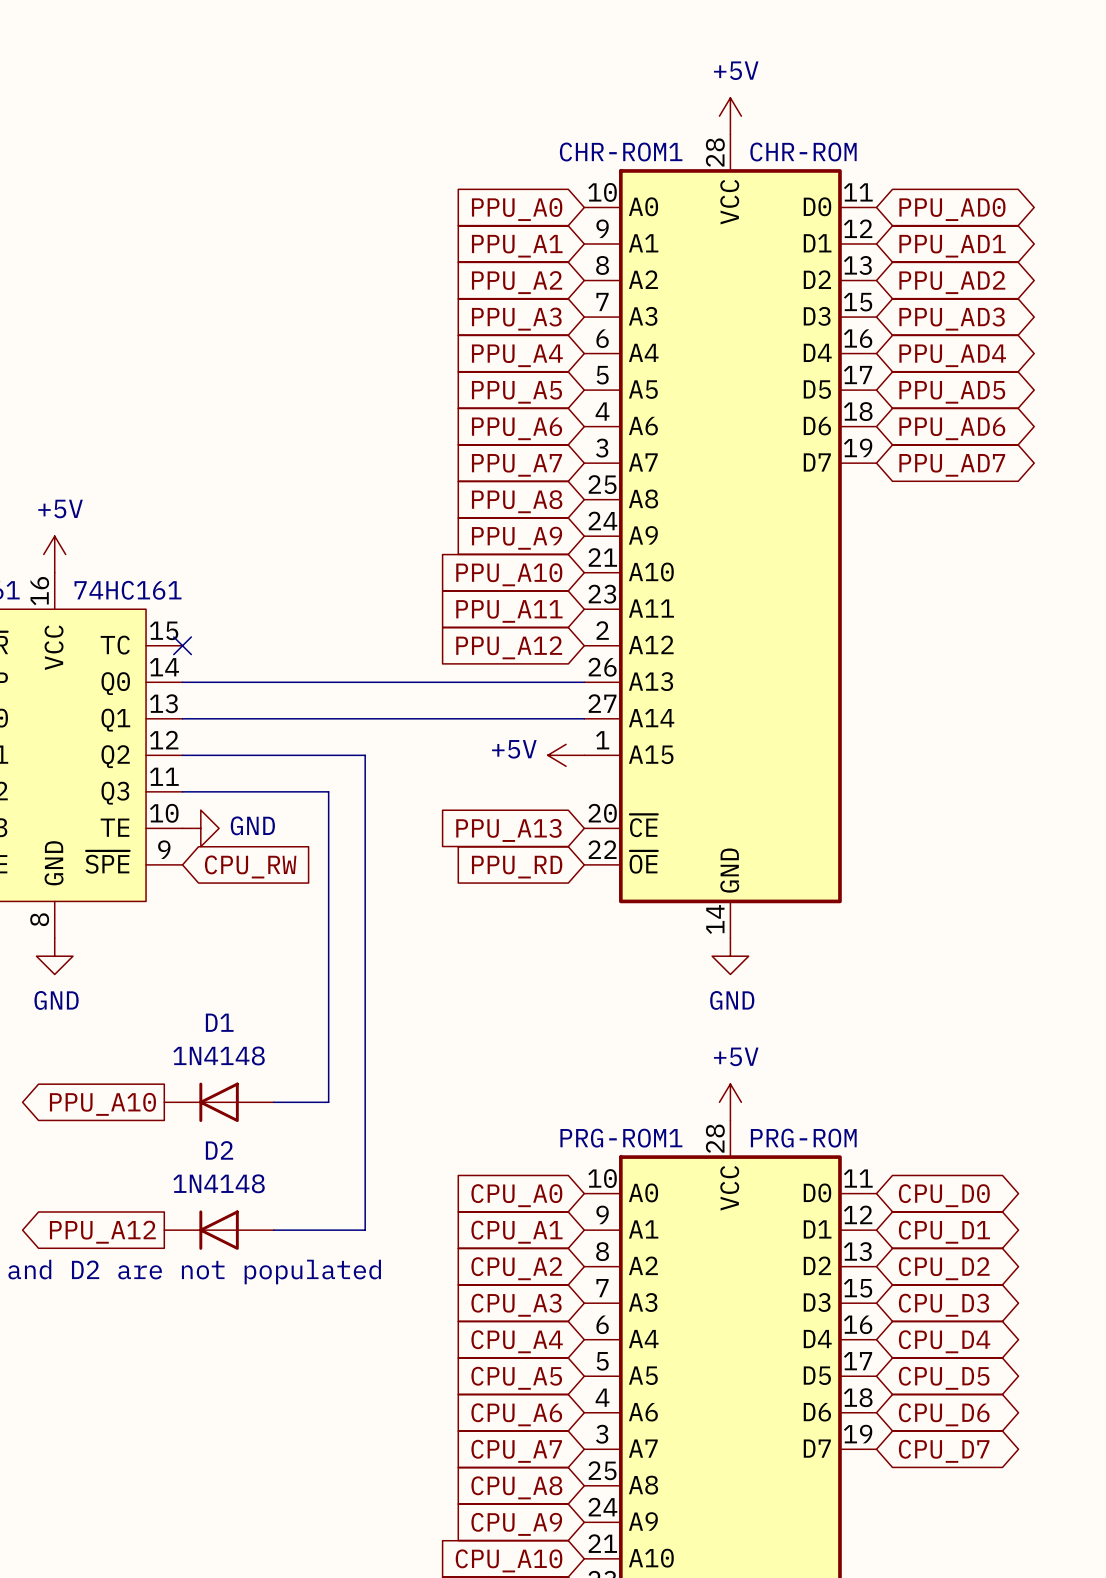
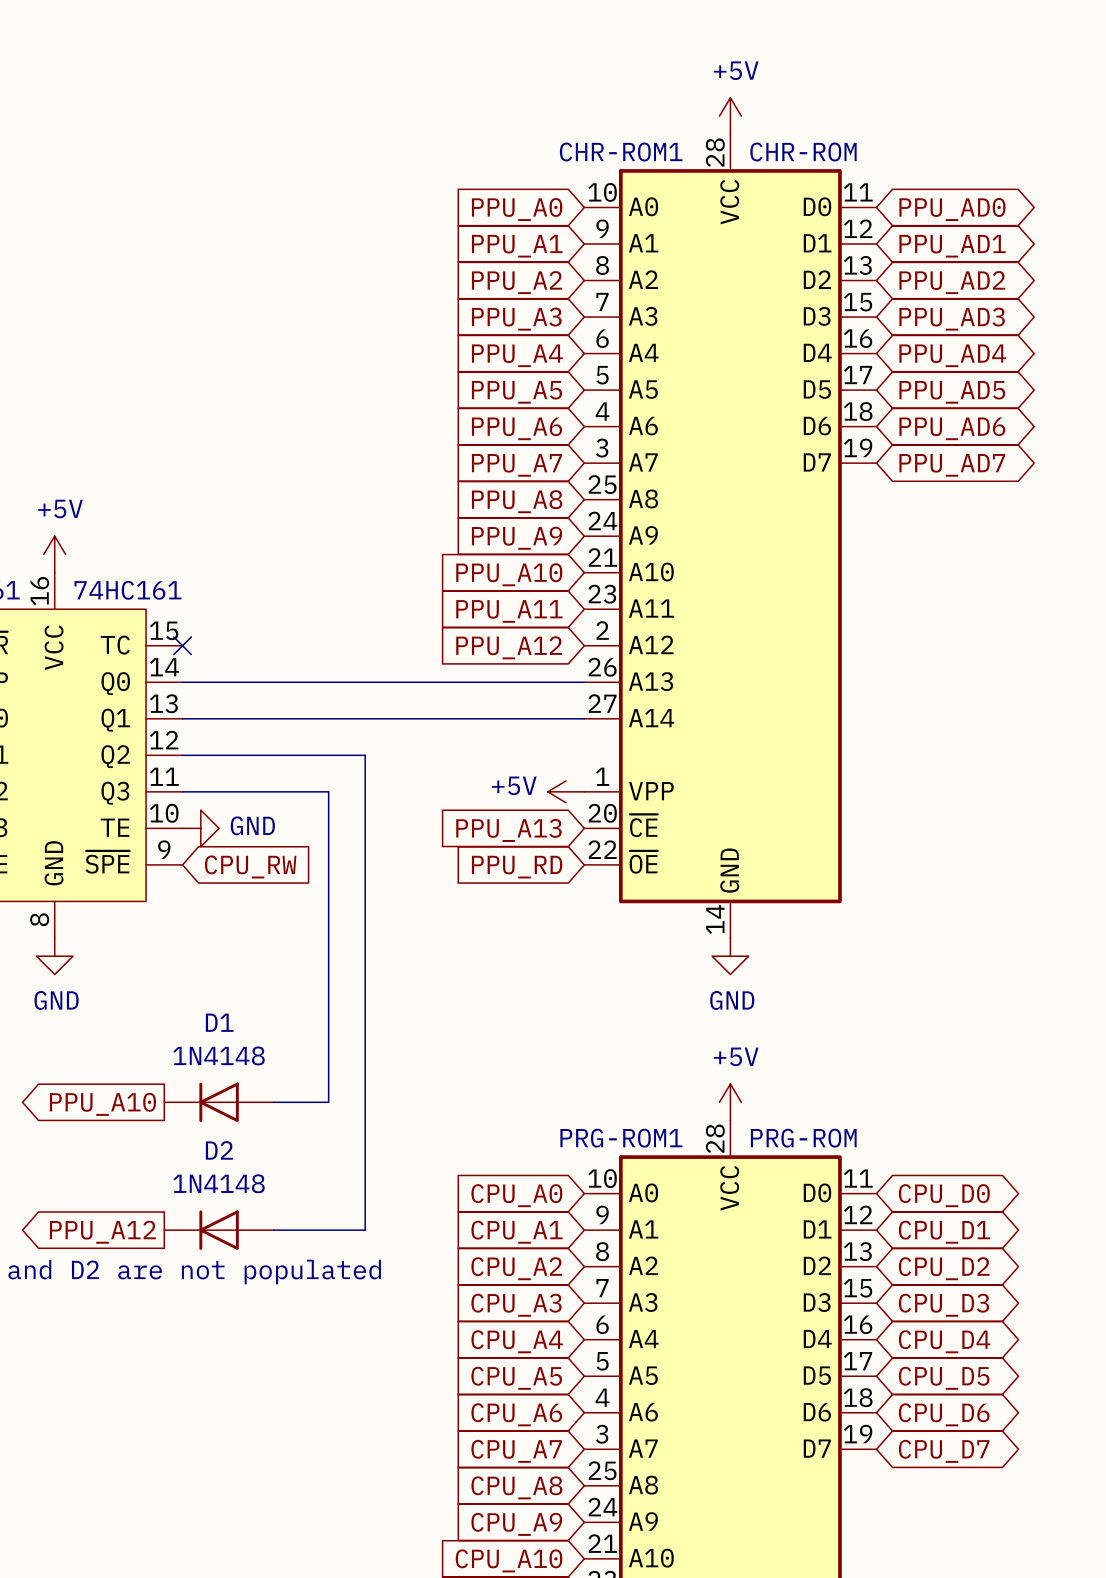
CHR-ROM1 symbol: [584, 134, 877, 938] -> [584, 134, 877, 938]
power symbol position: +5V (566, 755) -> +5V (566, 791)

